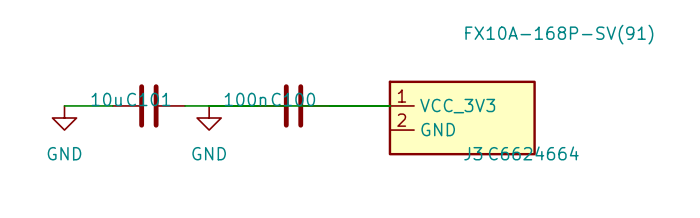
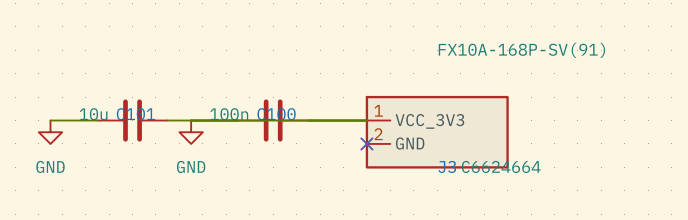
no-connect mark: none -> (366, 143)

